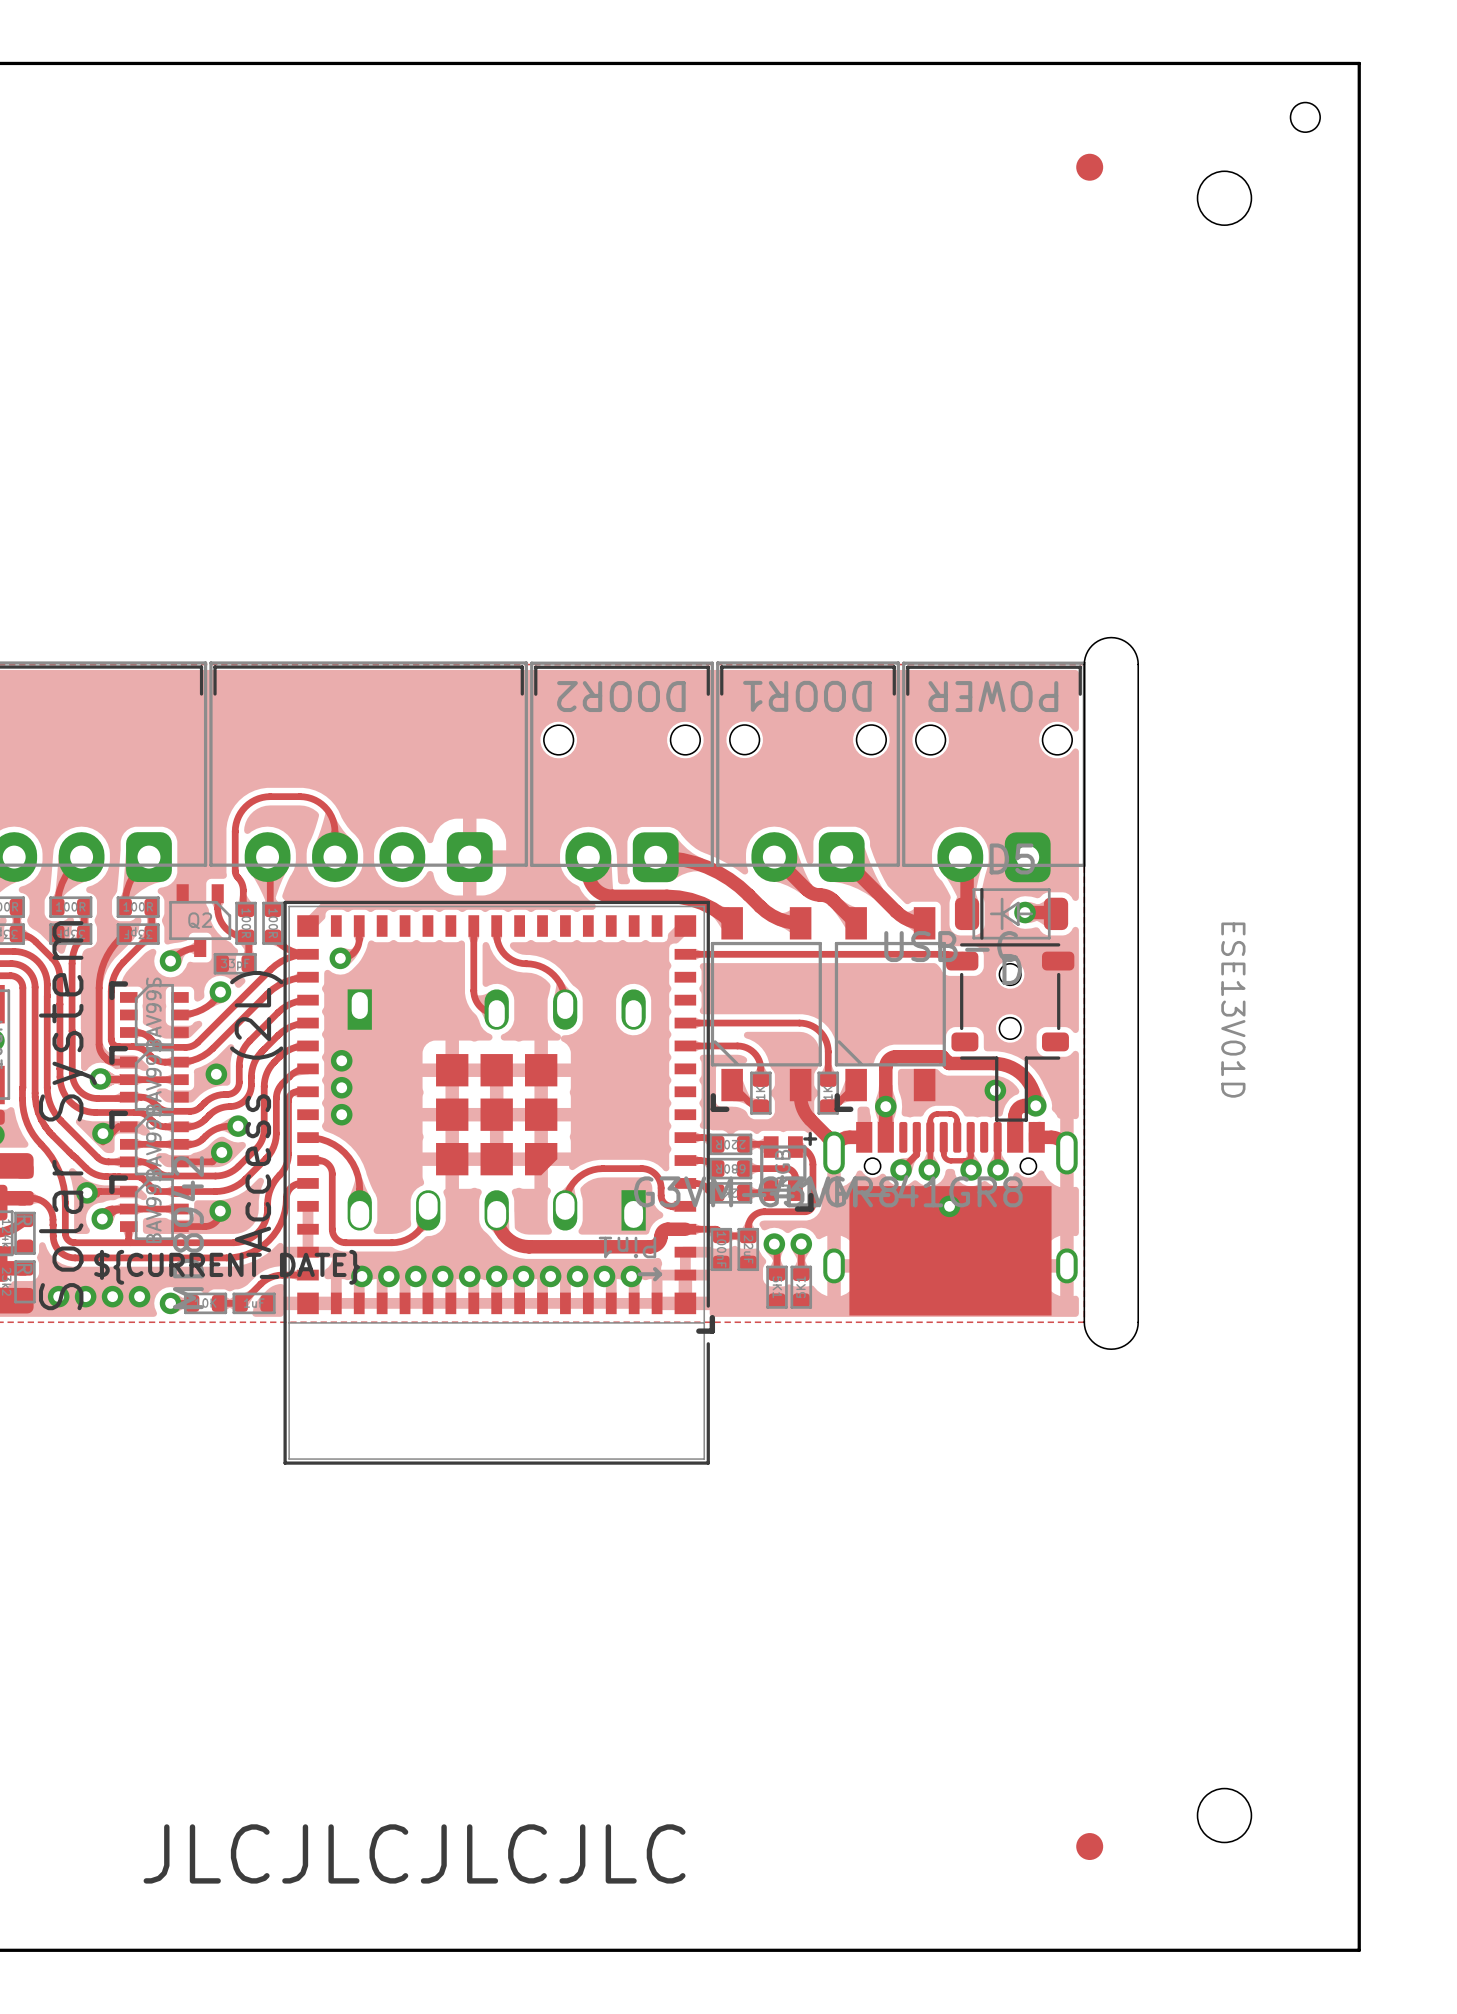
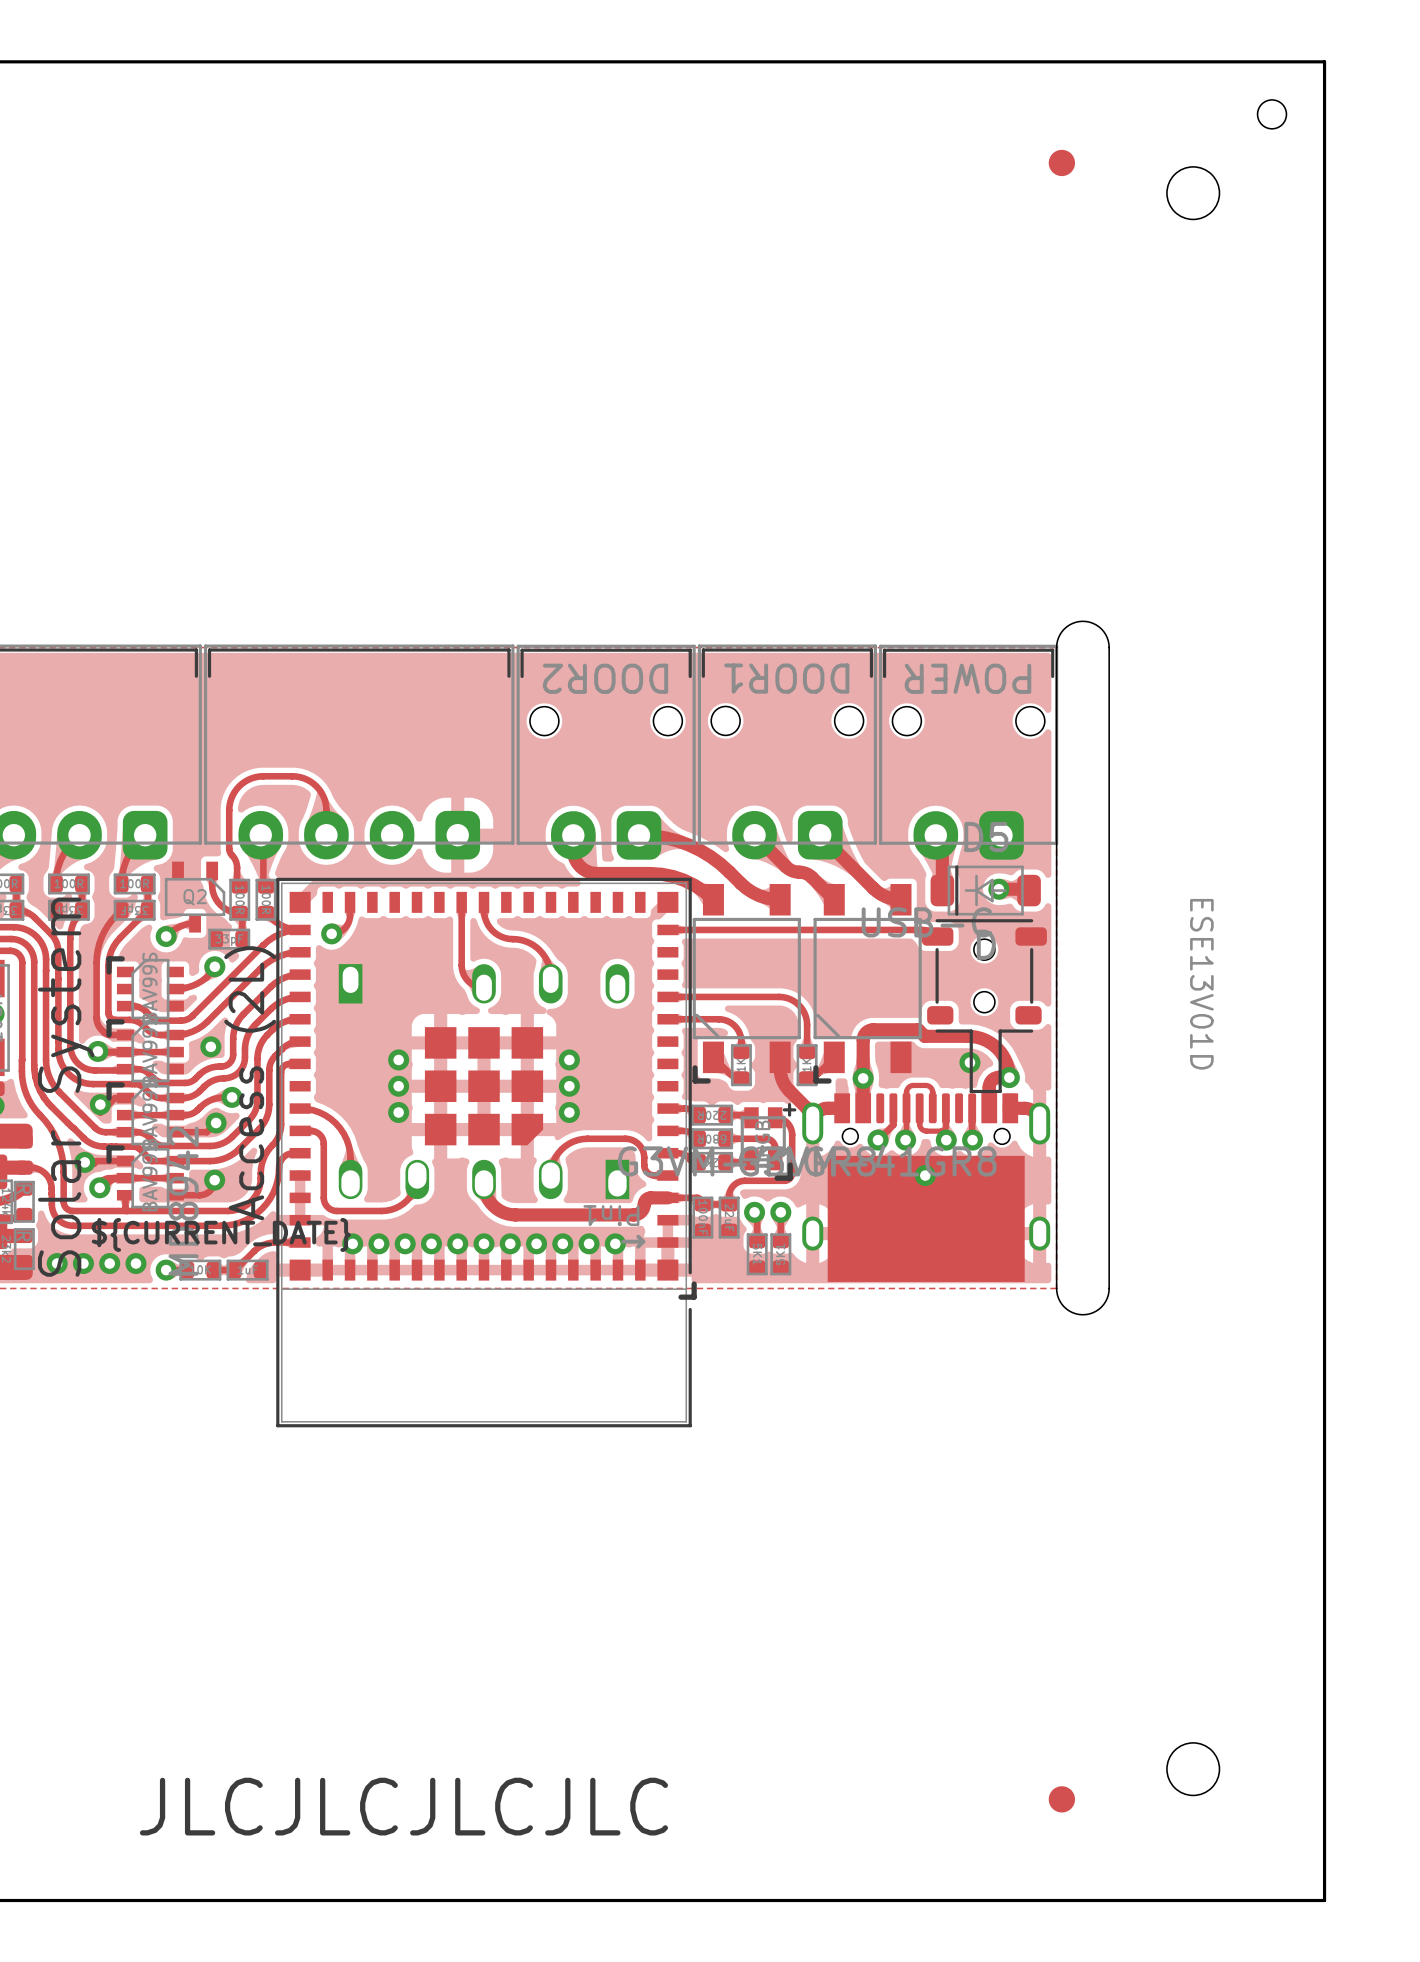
via: (341, 1060) -> none
via: (341, 1087) -> none
via: none -> (398, 1059)
via: none -> (569, 1059)
via: (341, 1114) -> none
via: none -> (398, 1086)
via: none -> (569, 1086)
via: none -> (398, 1112)
via: none -> (569, 1112)

